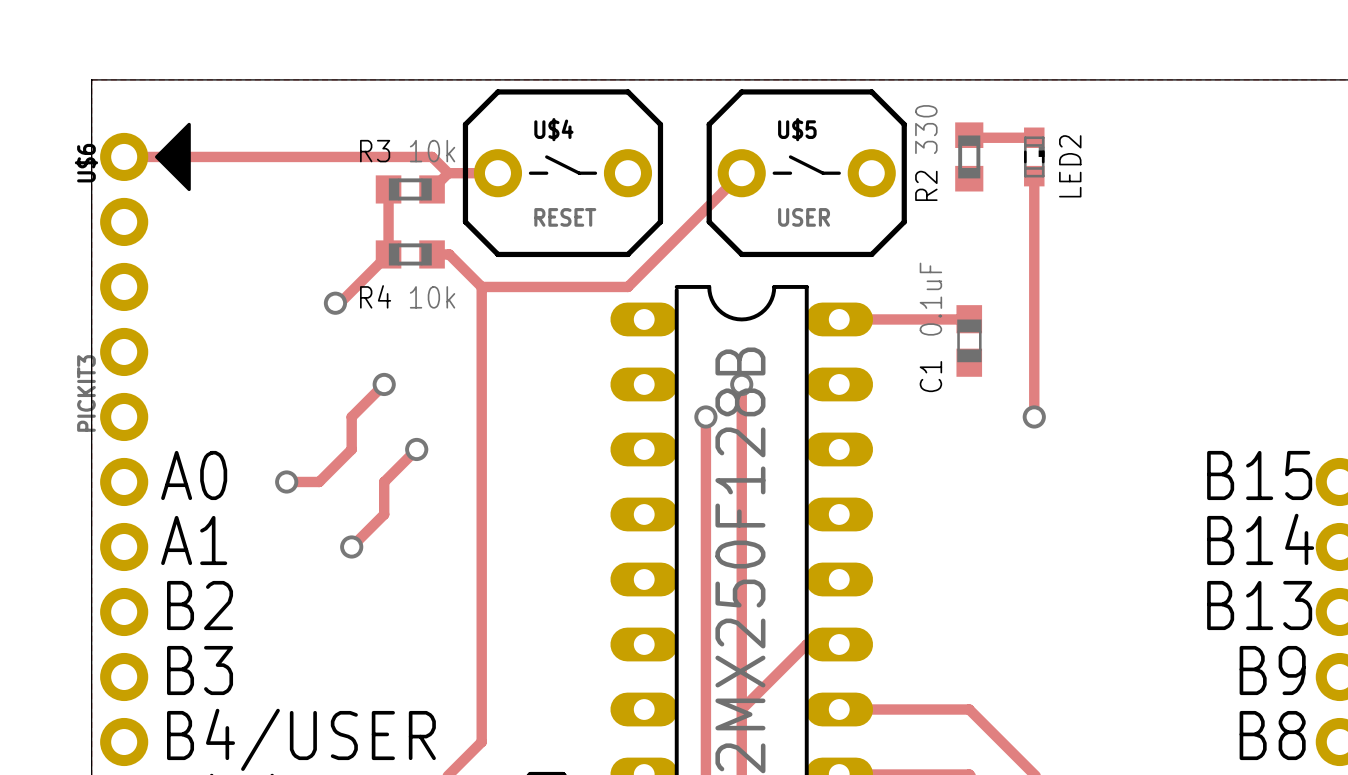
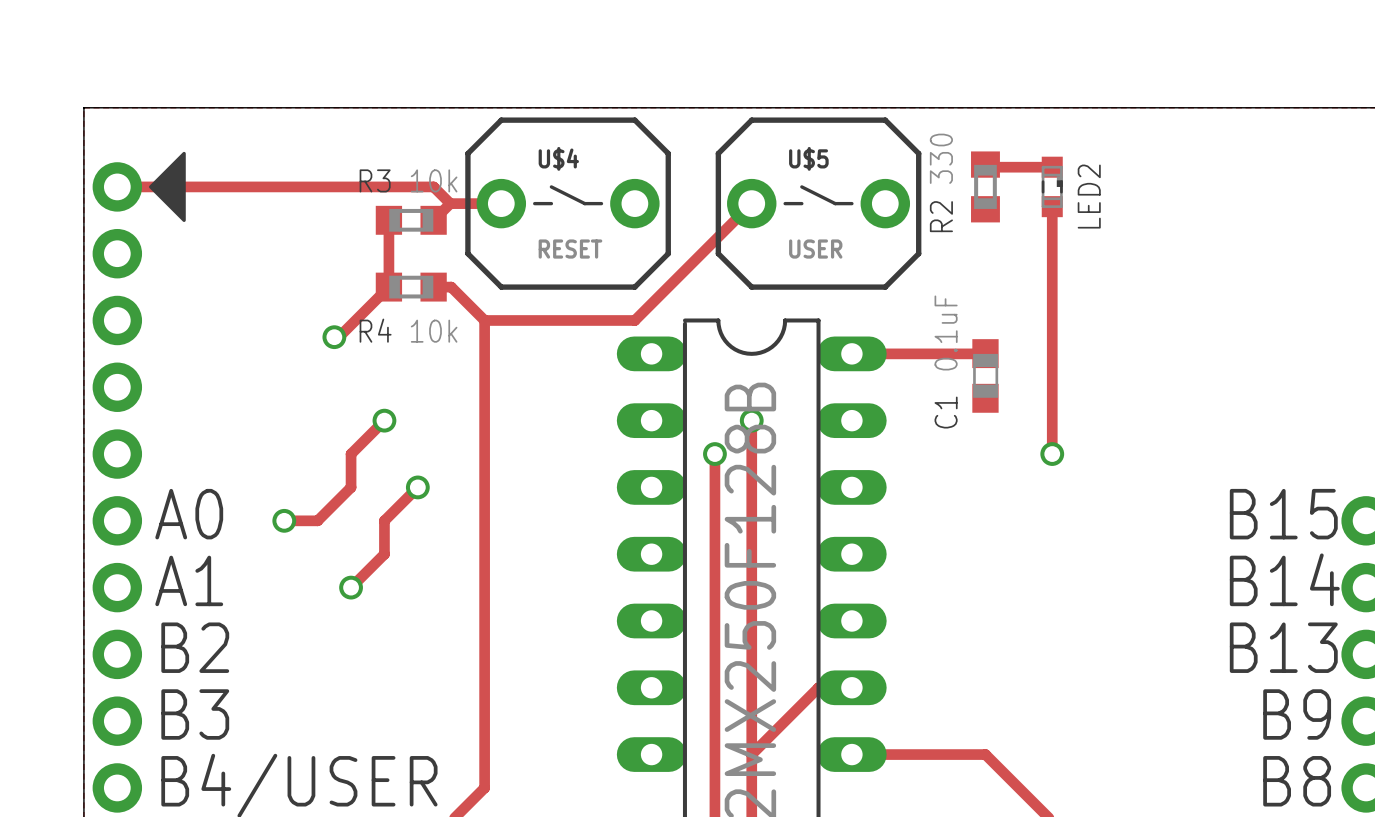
U$6 name: U$6 (86, 163) -> none
U$6 value: PICKIT3 (86, 393) -> none

